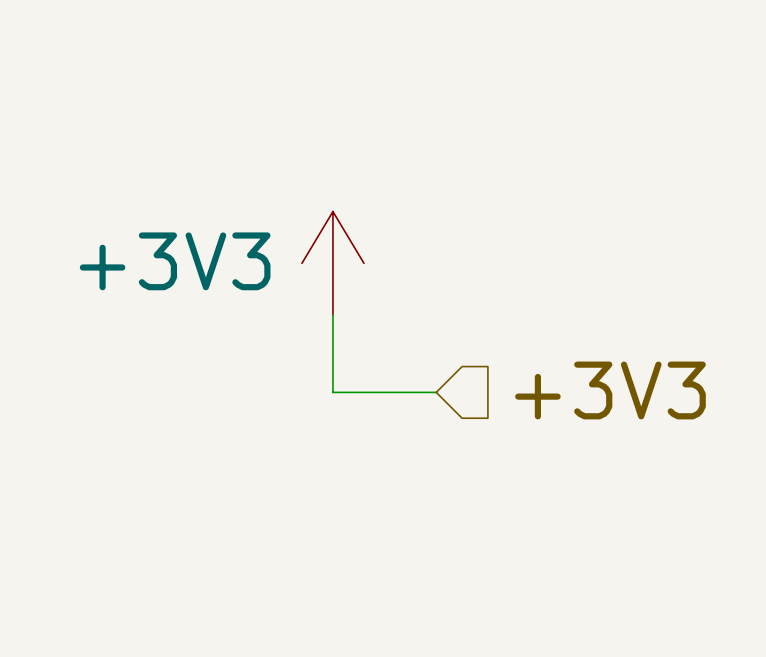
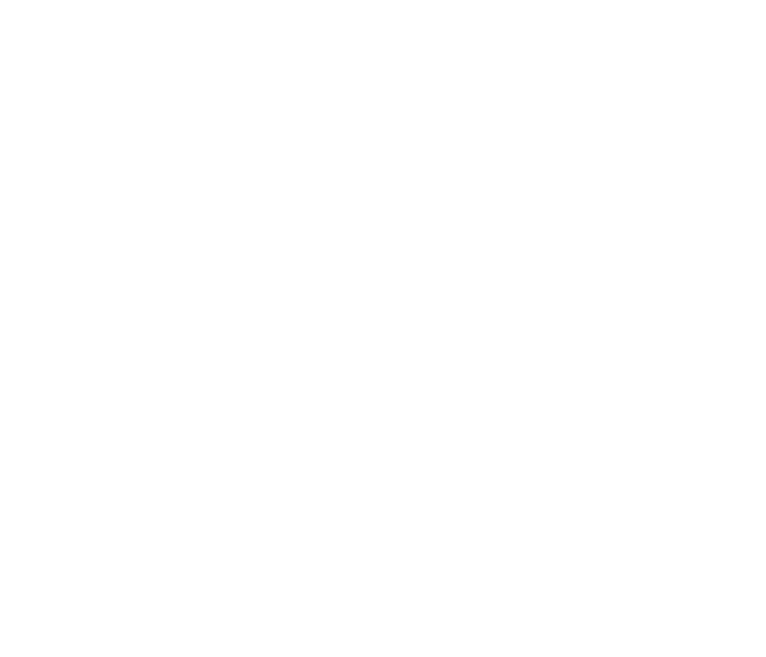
power symbol: +3V3 (332, 263) -> none
wire: (332, 314) (332, 392) (436, 392) -> none
hierarchical label: +3V3 (610, 390) -> none

